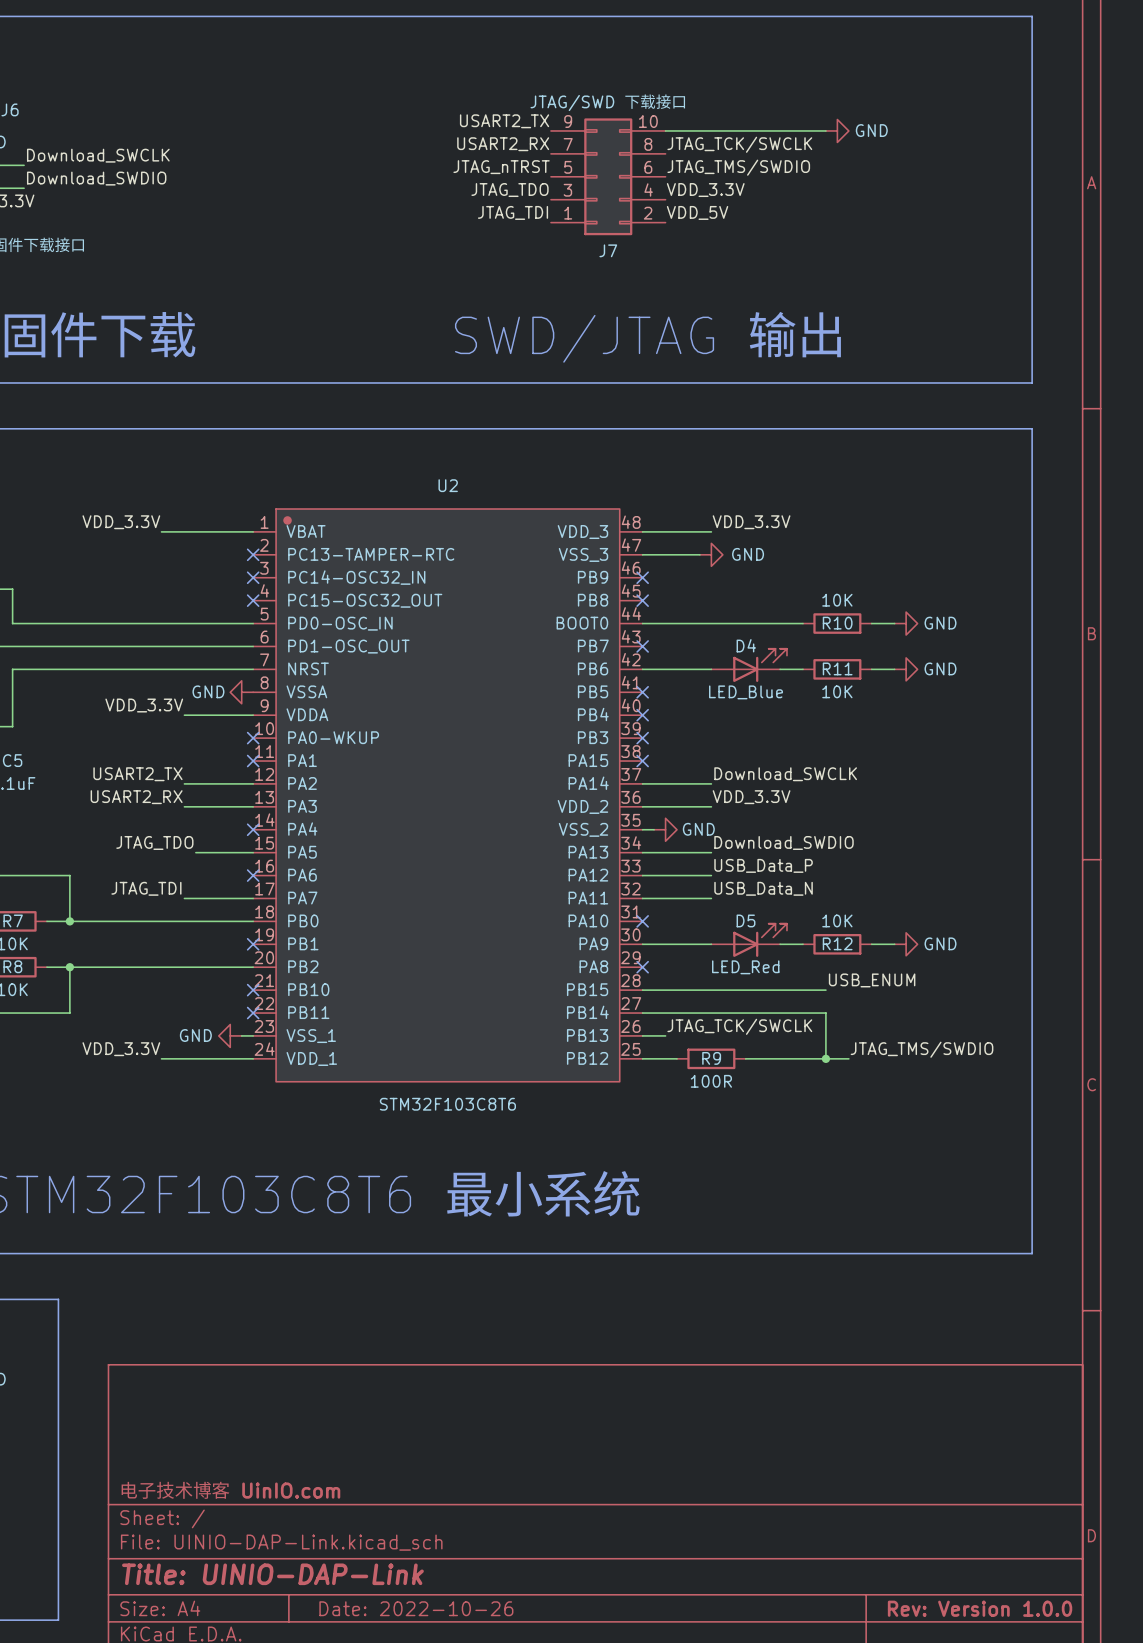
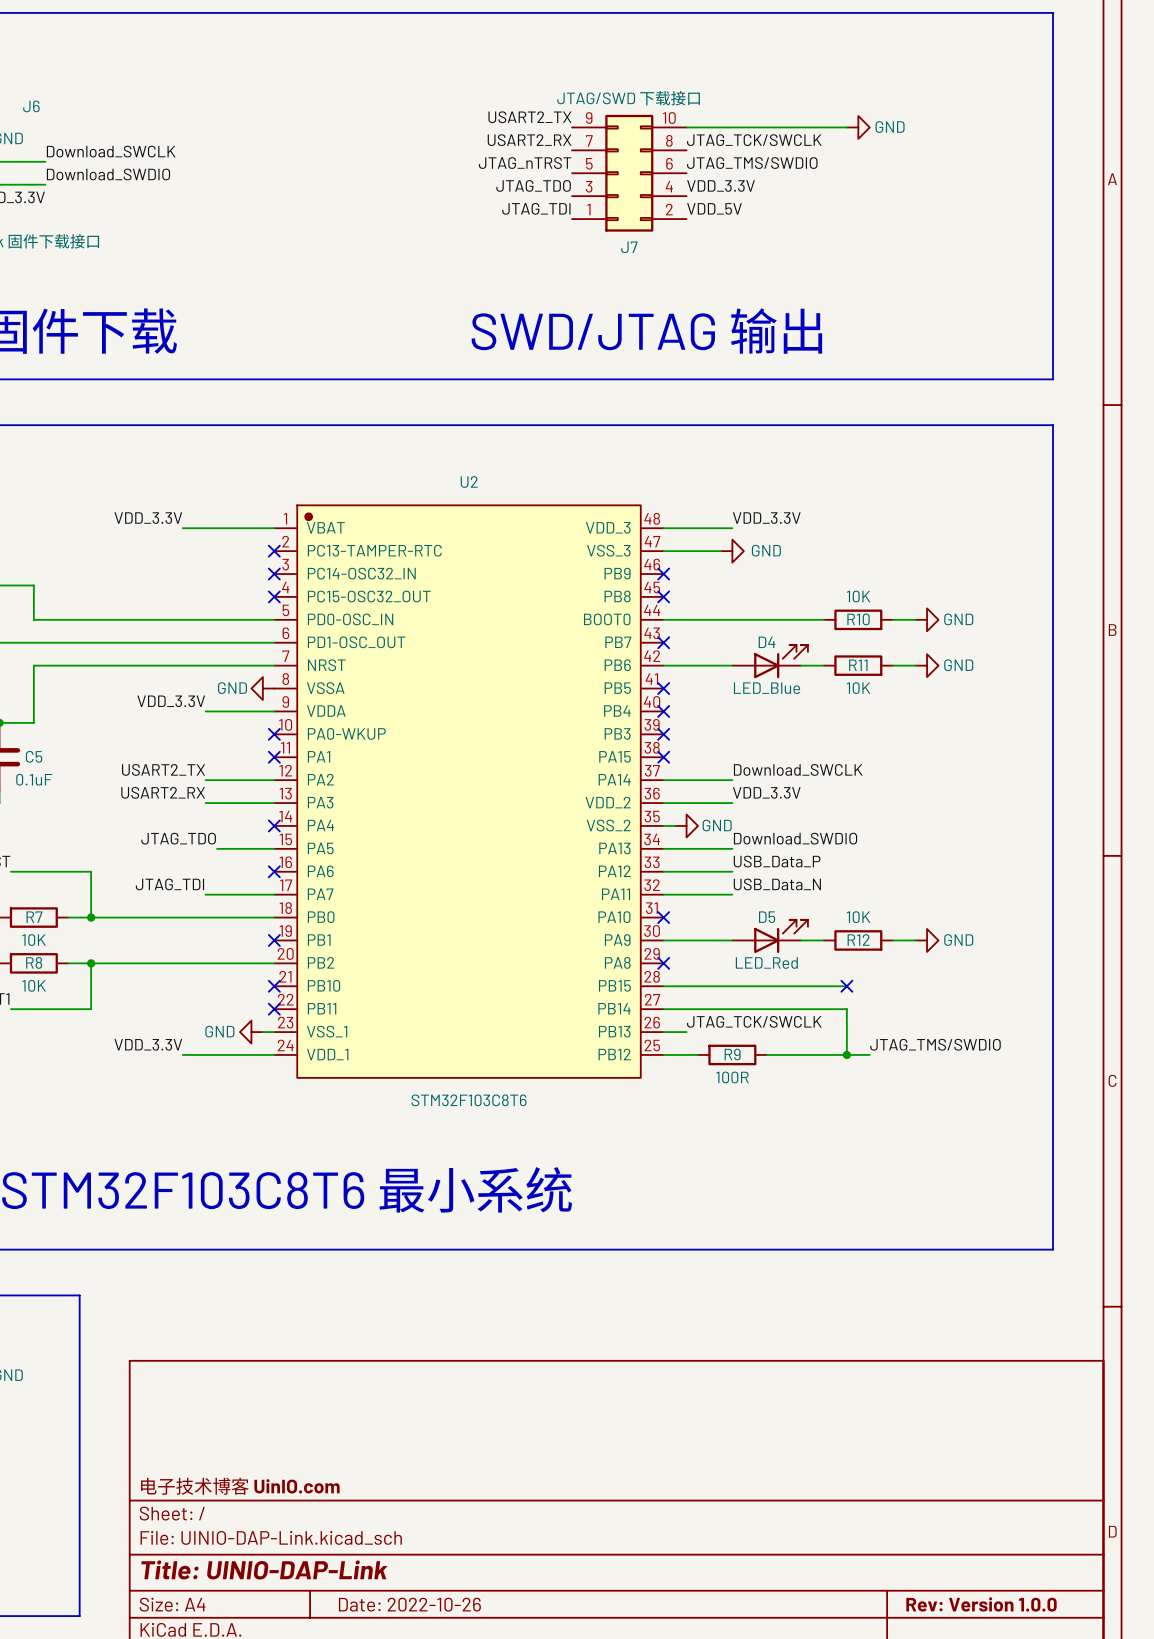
label: USB_ENUM (872, 980) -> none
no-connect mark: none -> (846, 986)

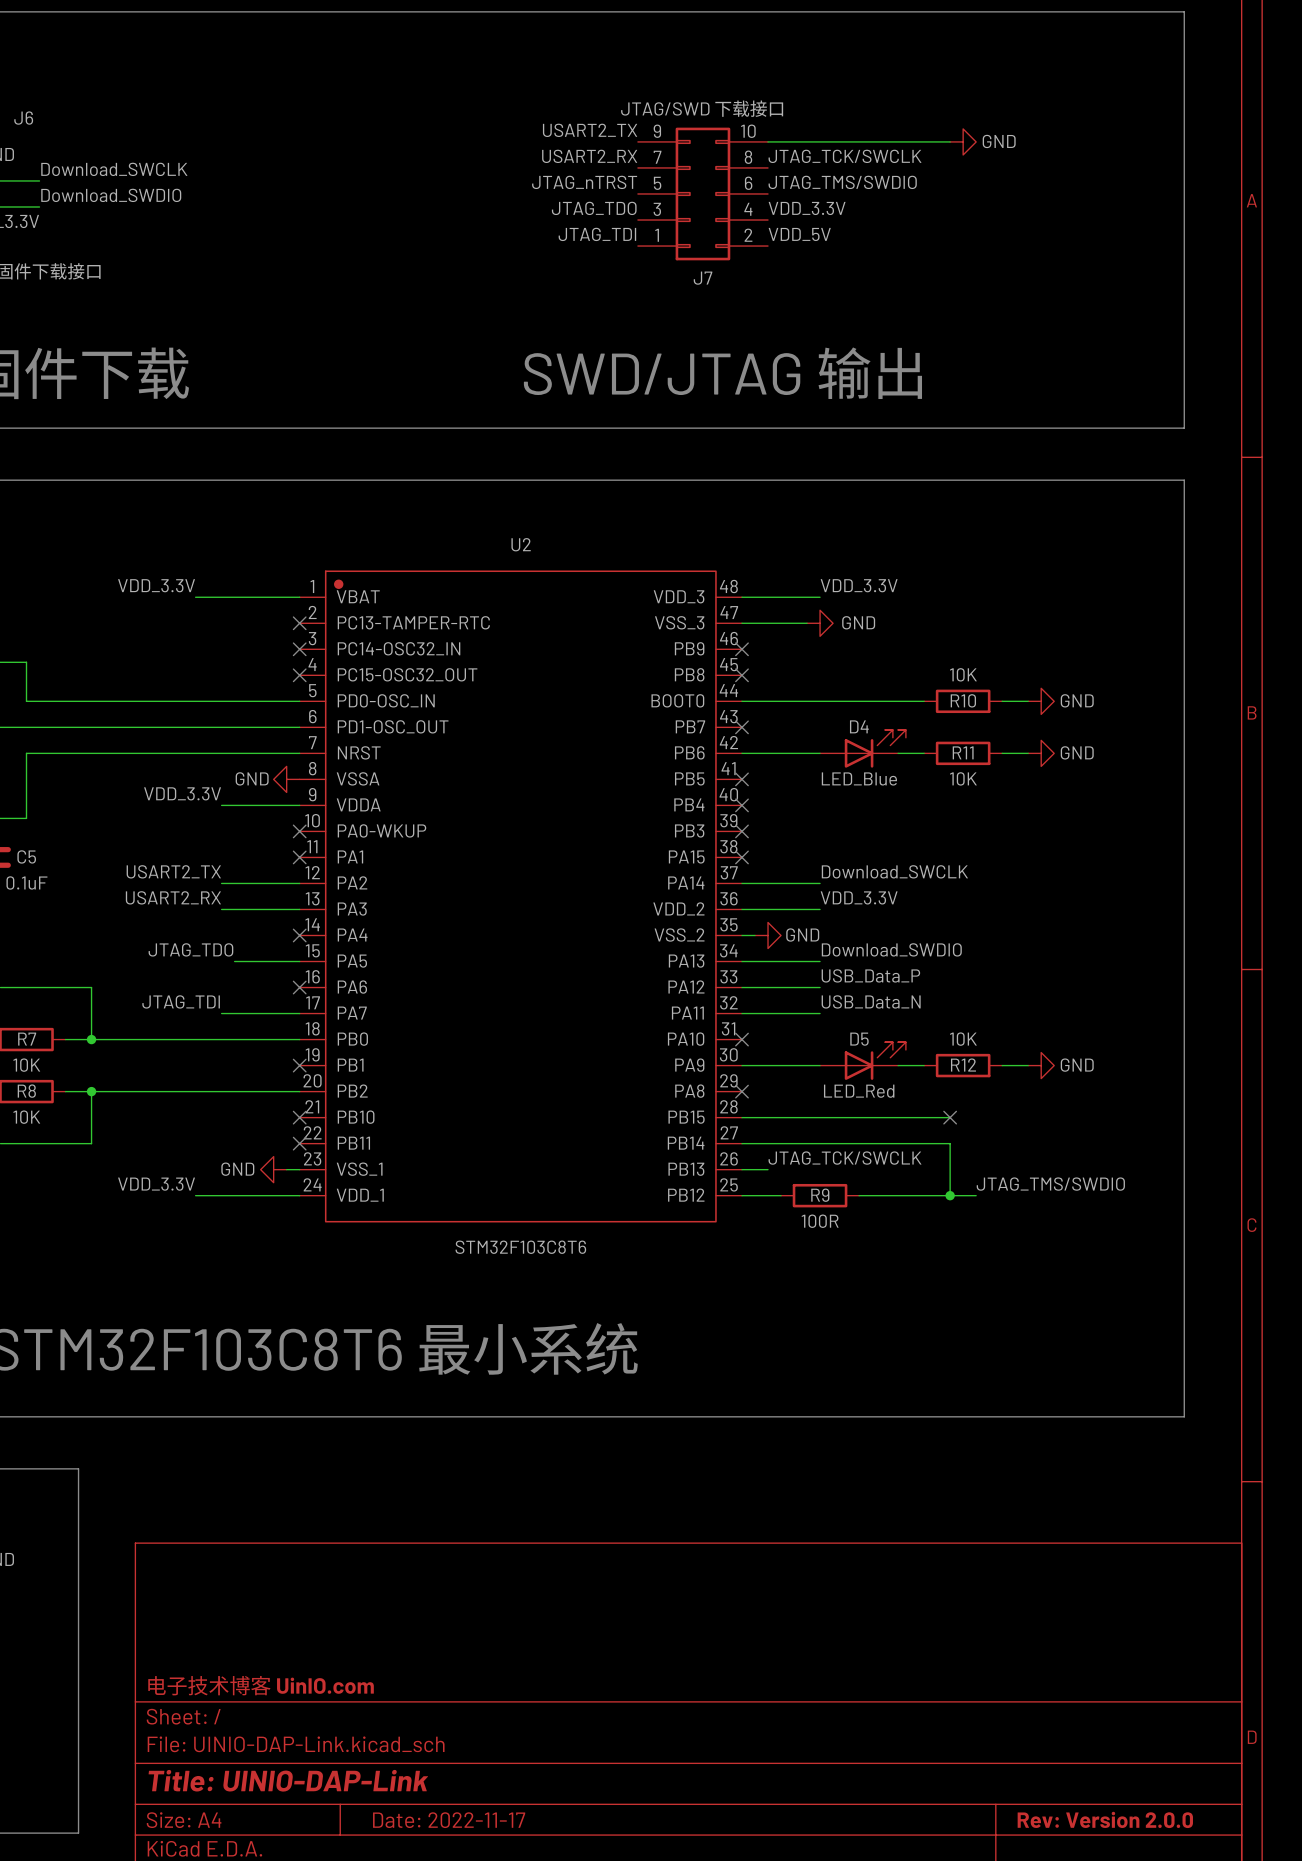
title block: Date: 2022-10-26 (409, 1604) -> Date: 2022-11-17 (449, 1820)
title block: Rev: Version 1.0.0 (981, 1604) -> Rev: Version 2.0.0 (1105, 1819)

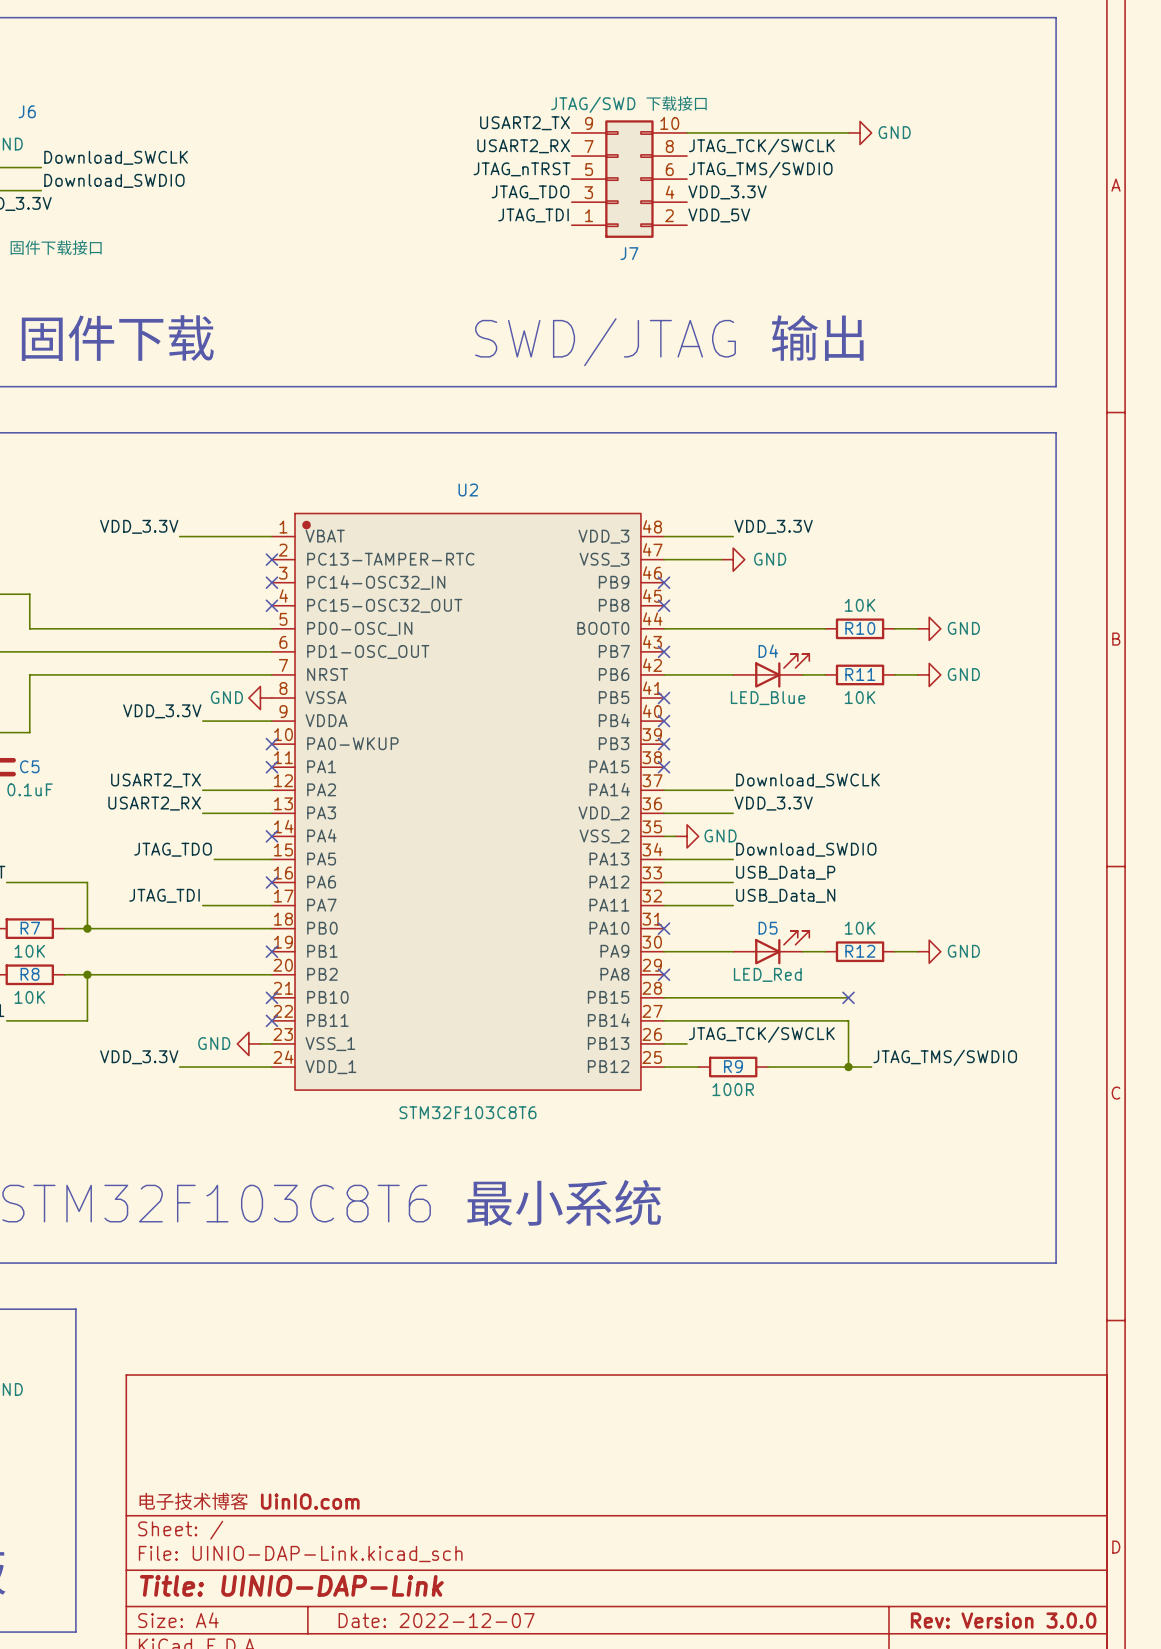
title block: Rev: Version 2.0.0 (1105, 1819) -> Rev: Version 3.0.0 (1003, 1620)
title block: Date: 2022-11-17 (449, 1820) -> Date: 2022-12-07 (436, 1620)

